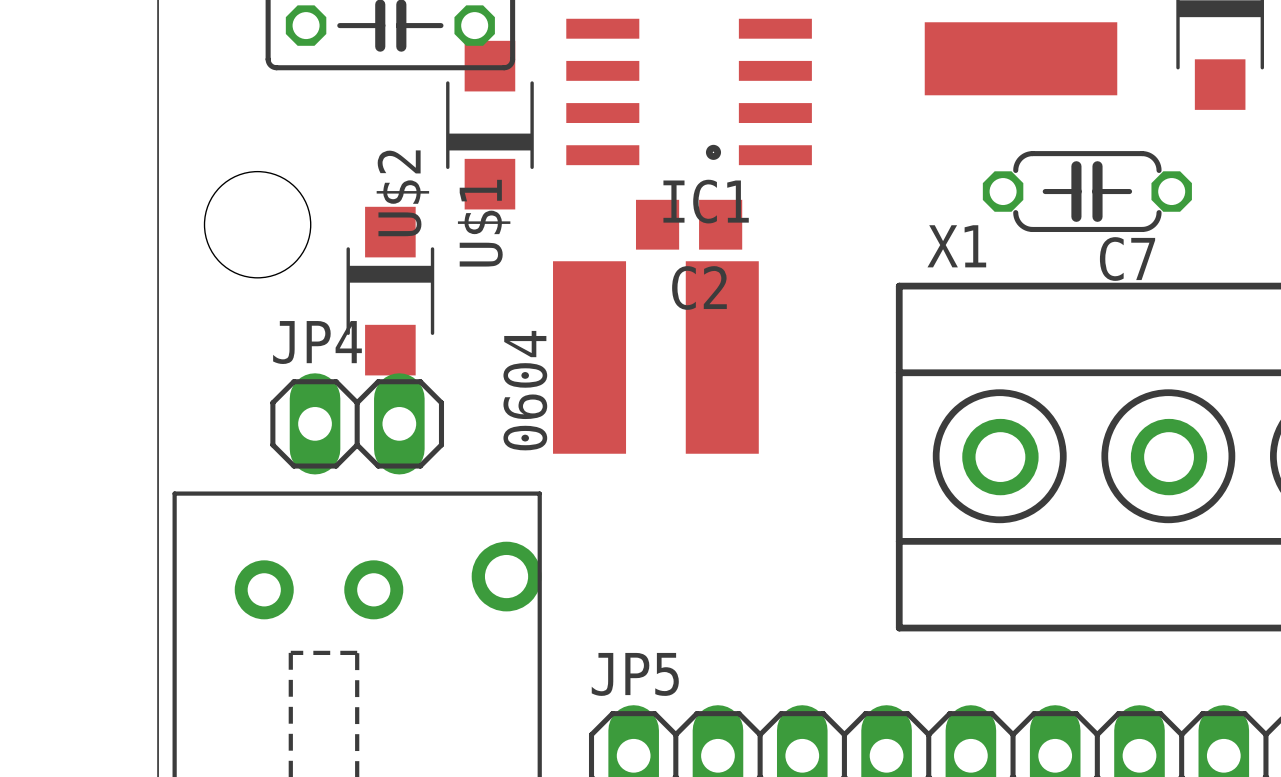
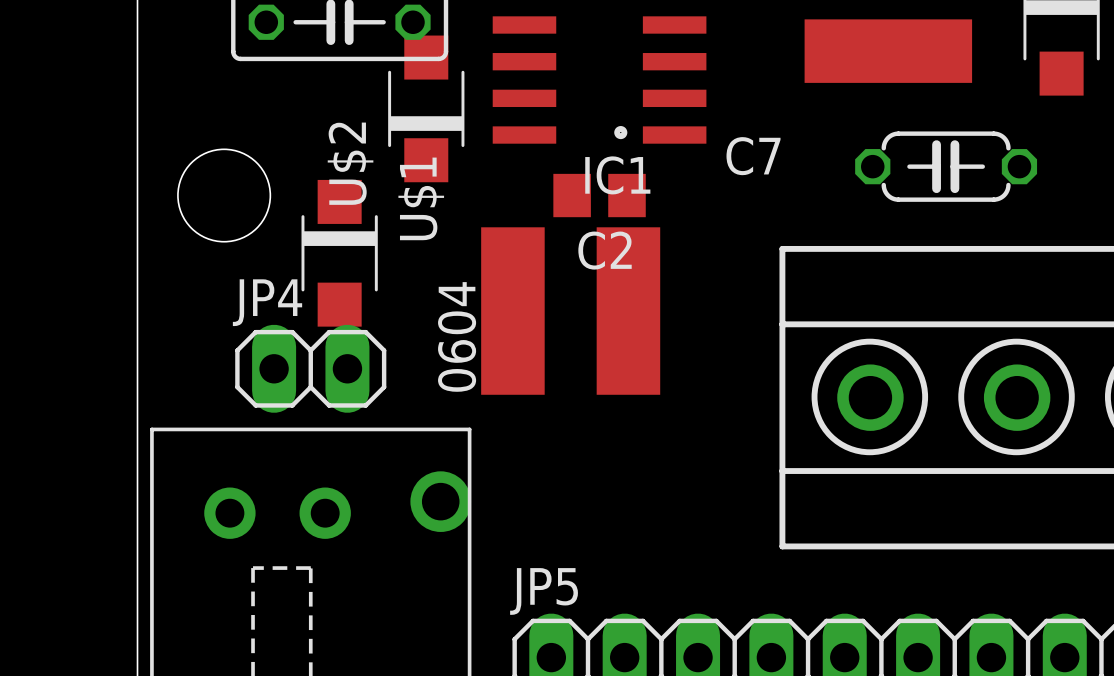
X1 name: X1 (956, 246) -> none
C7 name position: C7 (1127, 259) -> C7 (753, 156)

